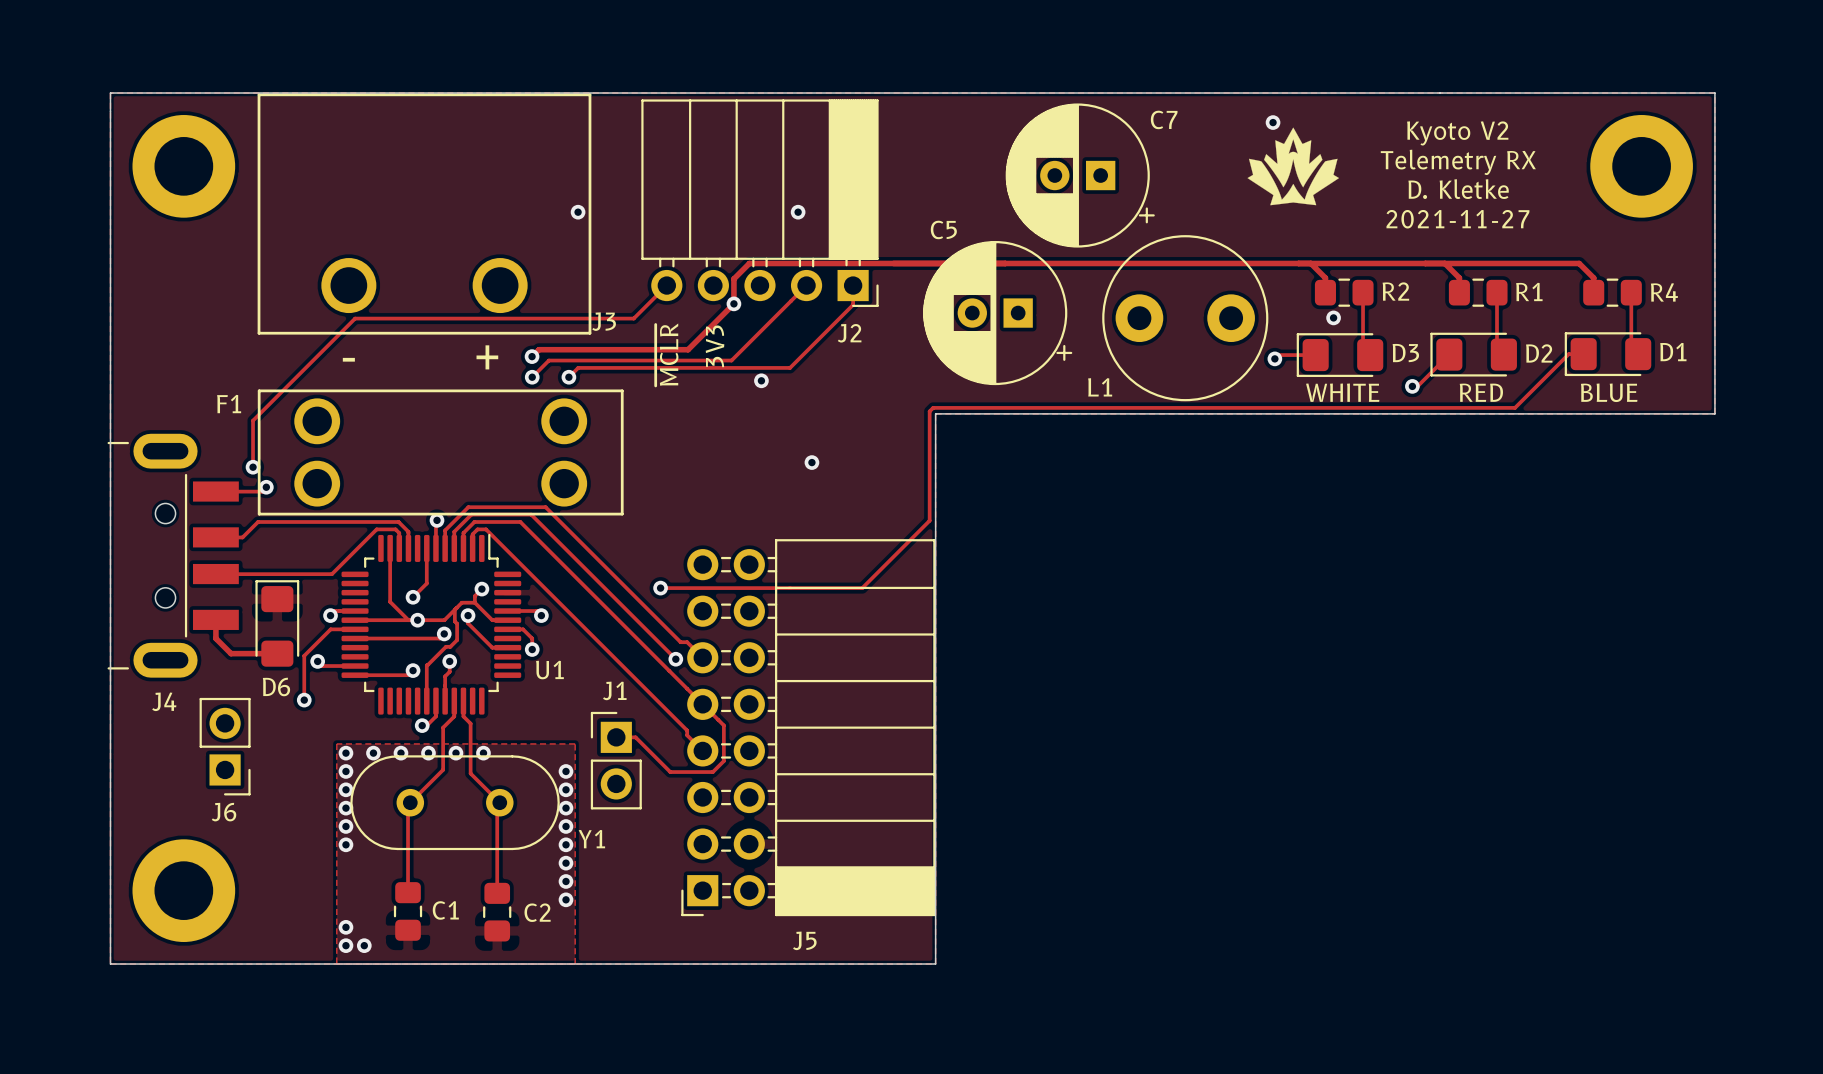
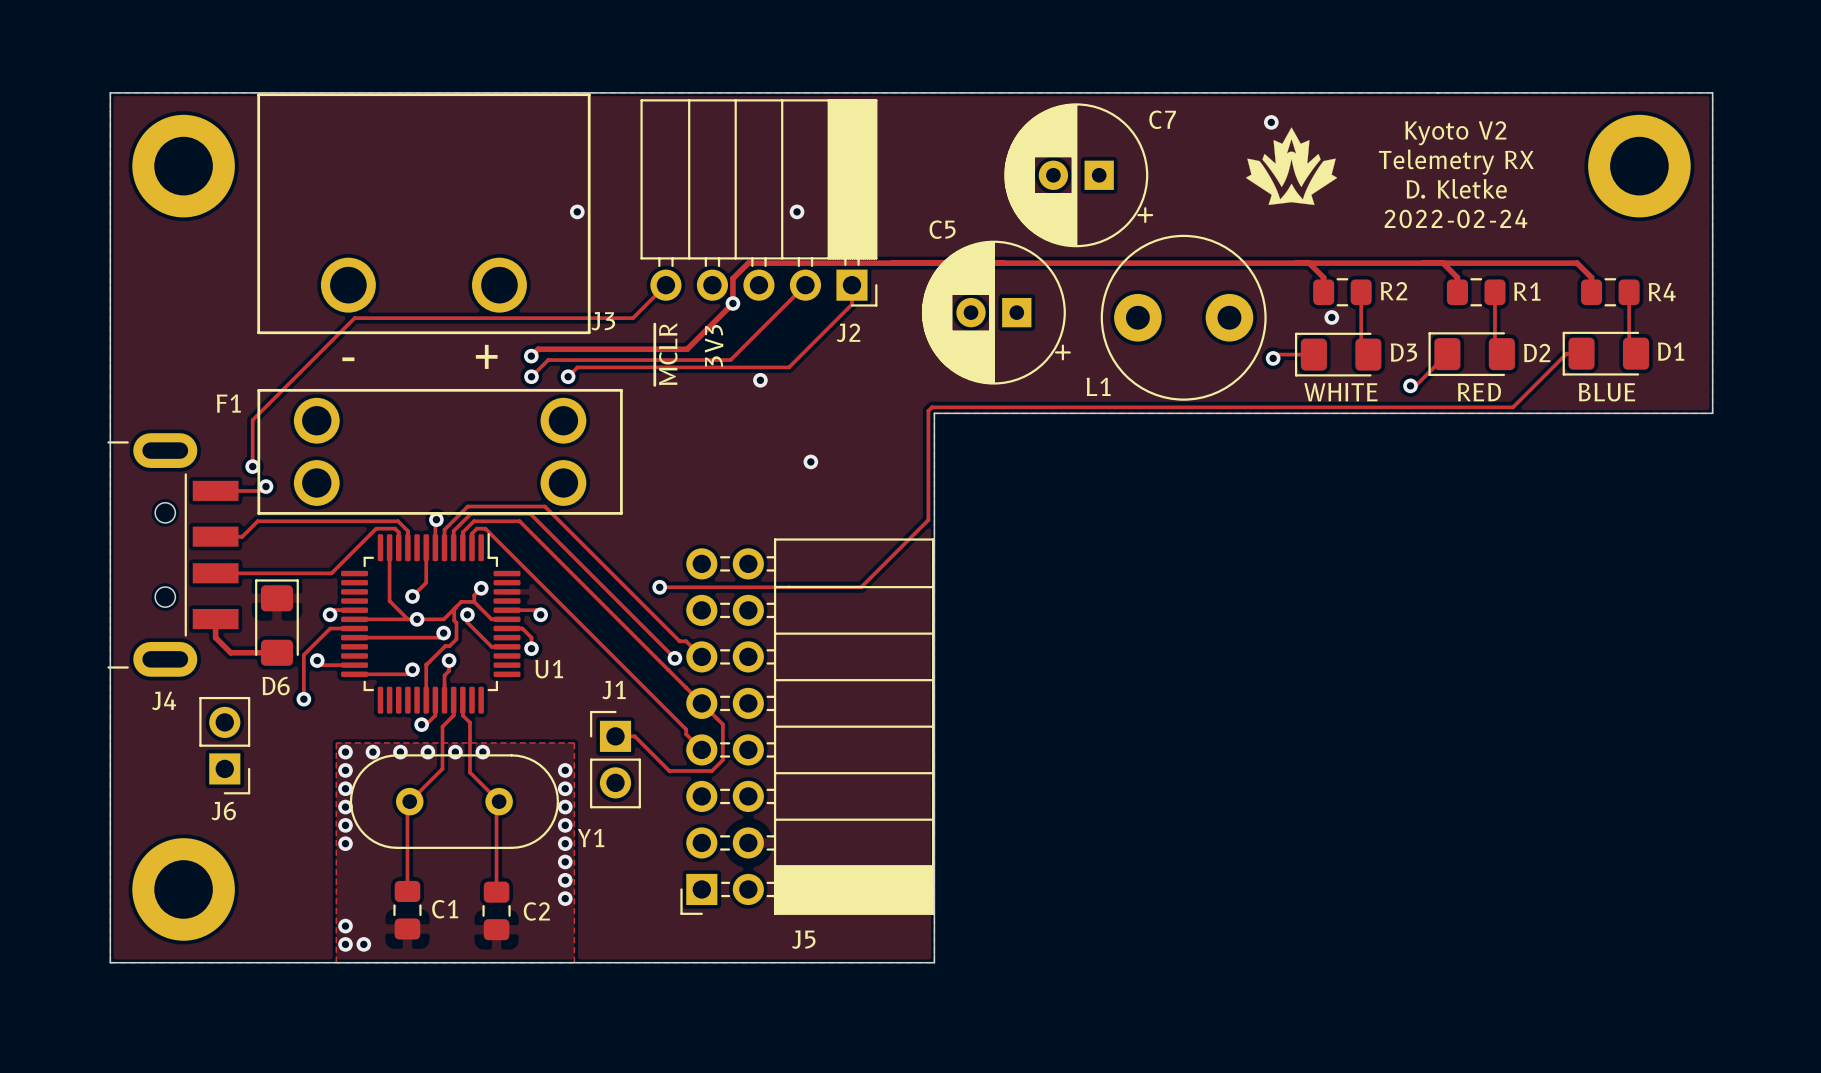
text: 2021-11-27 (1457, 219) -> 2022-02-24 (1455, 218)

